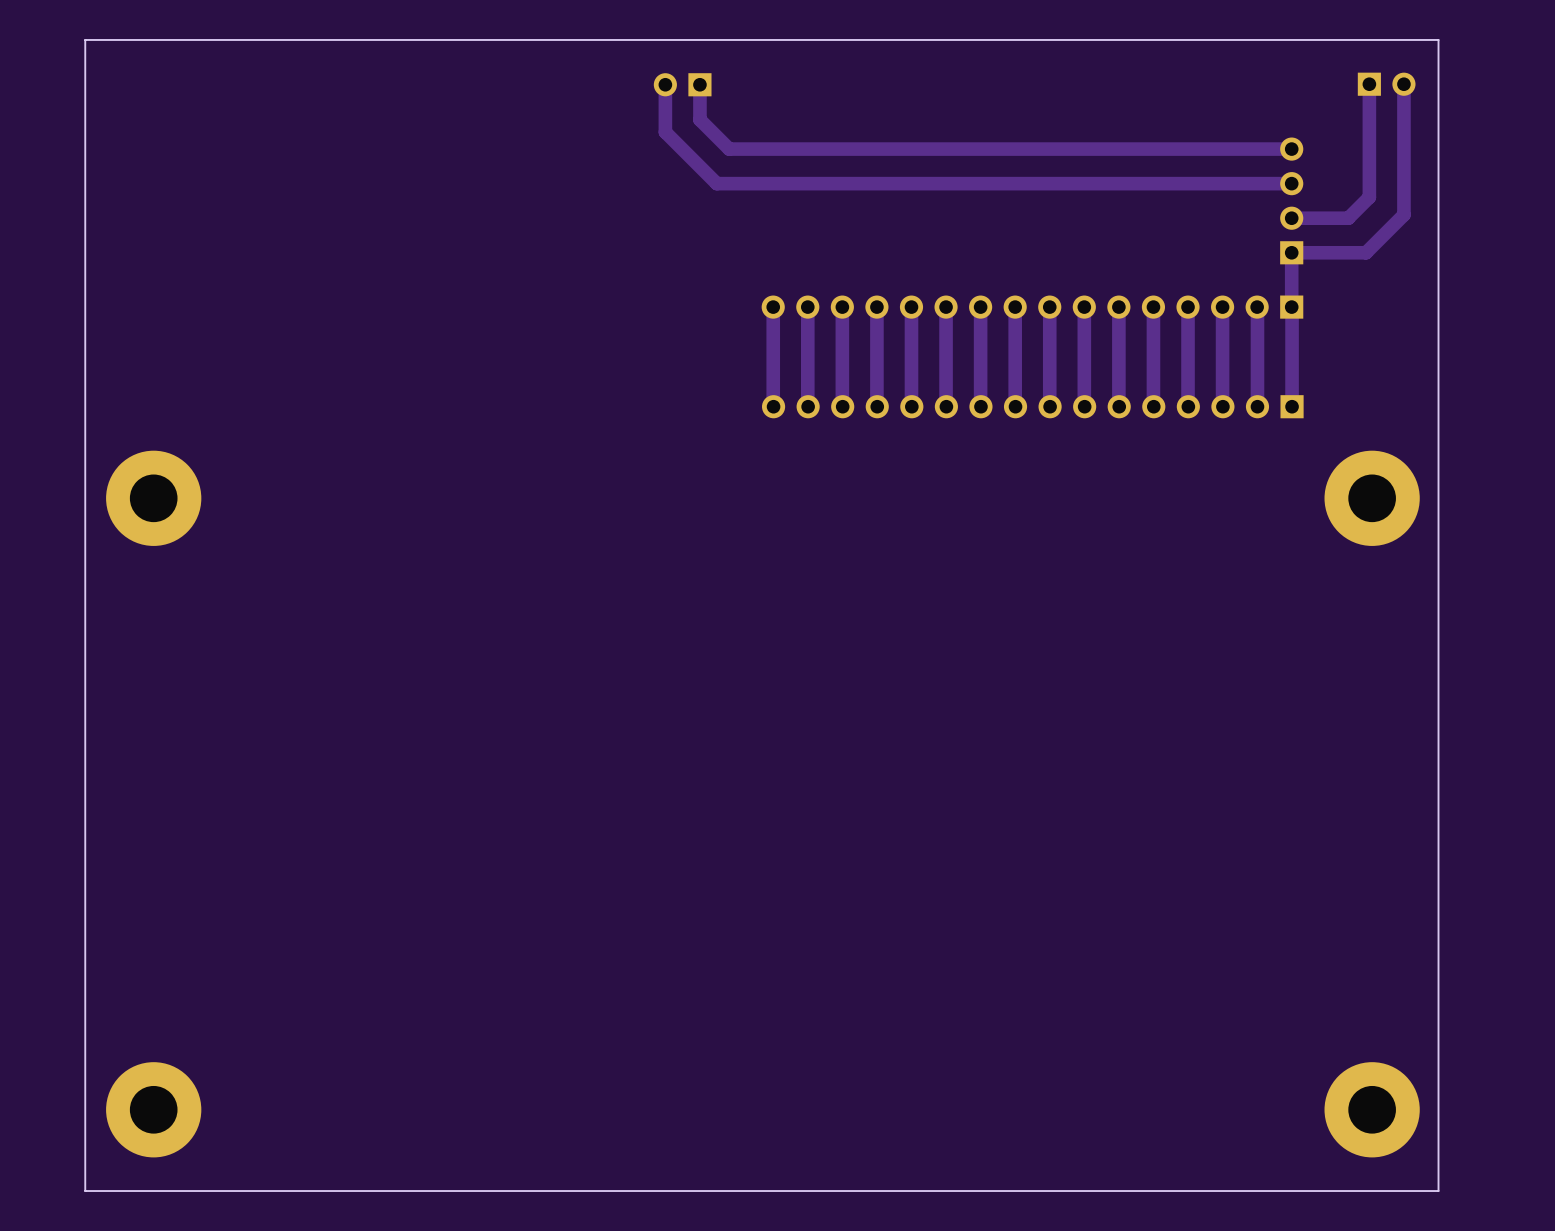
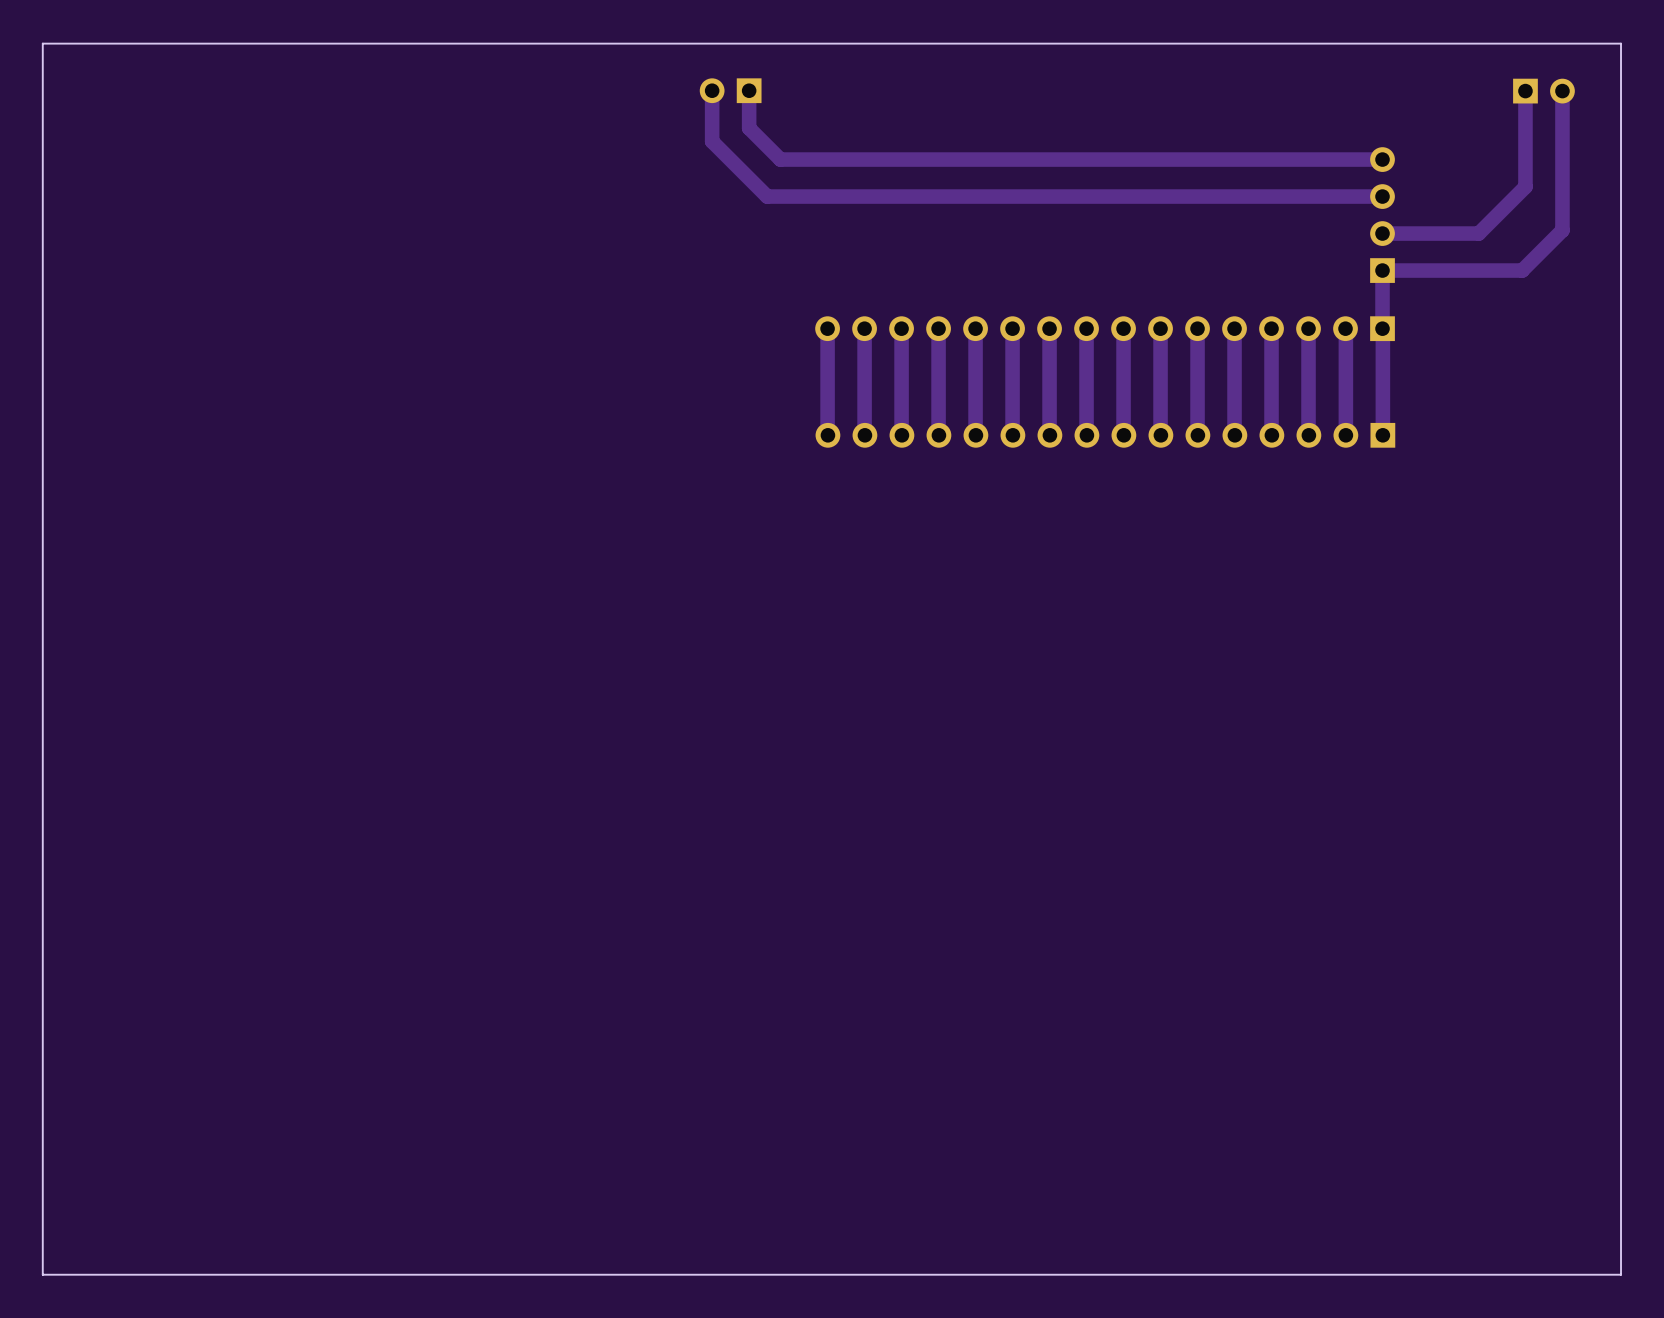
track: (1369, 84) (1369, 197) (1348, 218) -> (1525, 91) (1525, 186) (1478, 233) (1443, 233)
part position: (1386, 84) -> (1543, 91)
track: (1403, 84) (1403, 214) (1366, 252) -> (1562, 91) (1562, 230) (1522, 270) (1462, 270)
part: (153, 498) -> none
part: (1372, 498) -> none
part: (153, 1109) -> none
part: (1372, 1109) -> none
board edge: (1438, 1191) (1438, 39) (85, 39) (85, 1191) -> (1539, 1274) (1621, 1274) (1621, 43) (42, 43) (42, 1274) (91, 1274)

